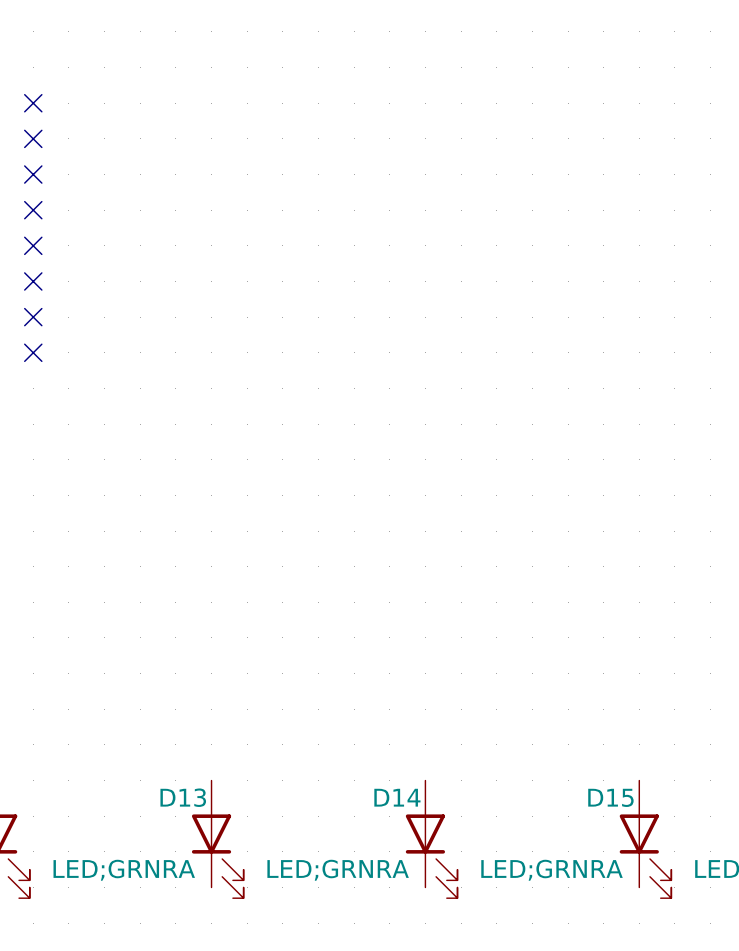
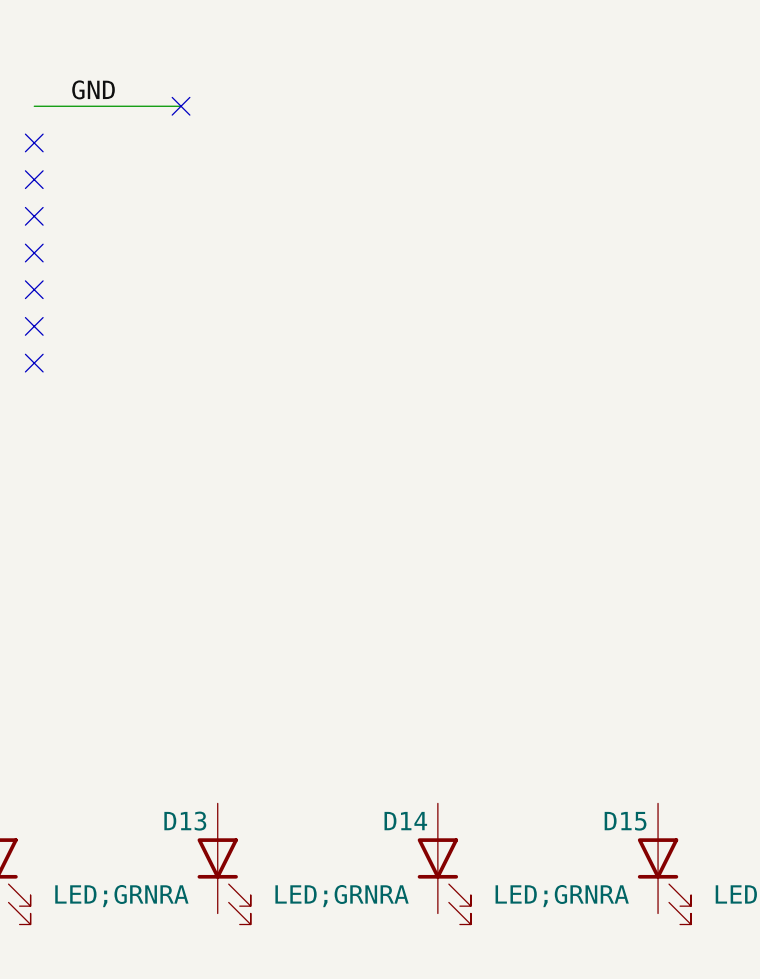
label: none -> GND (93, 89)
wire: none -> (34, 106) (181, 106)
no-connect mark: (33, 103) -> none
no-connect mark: none -> (181, 106)

